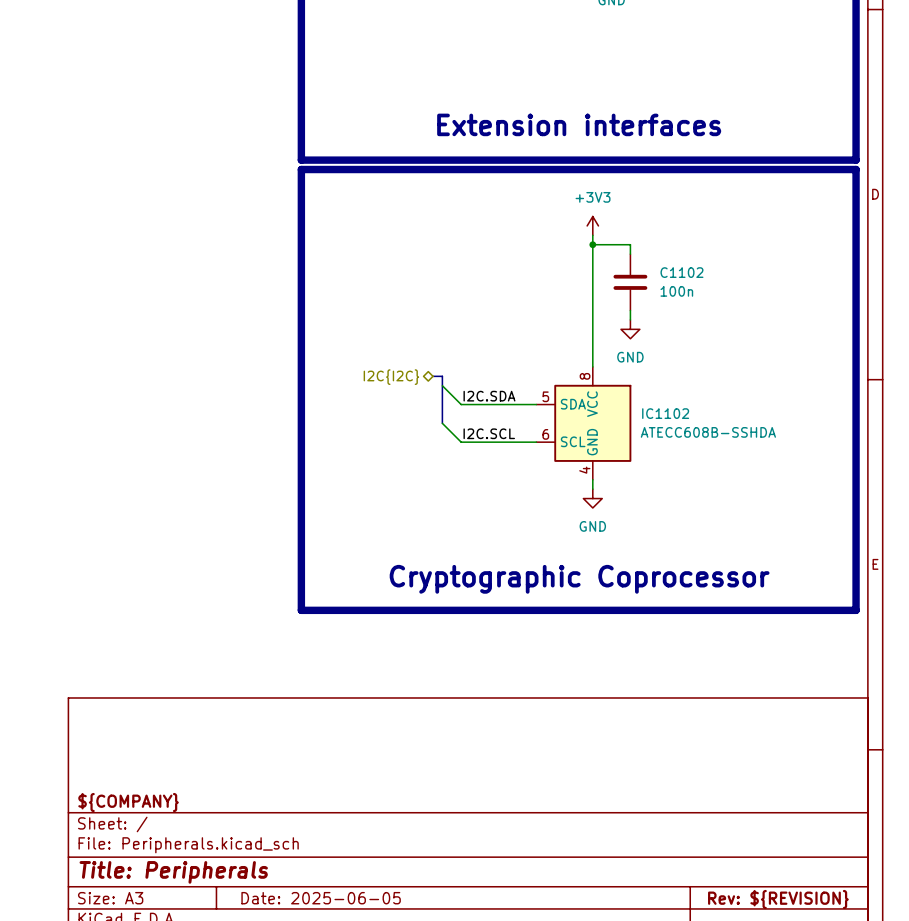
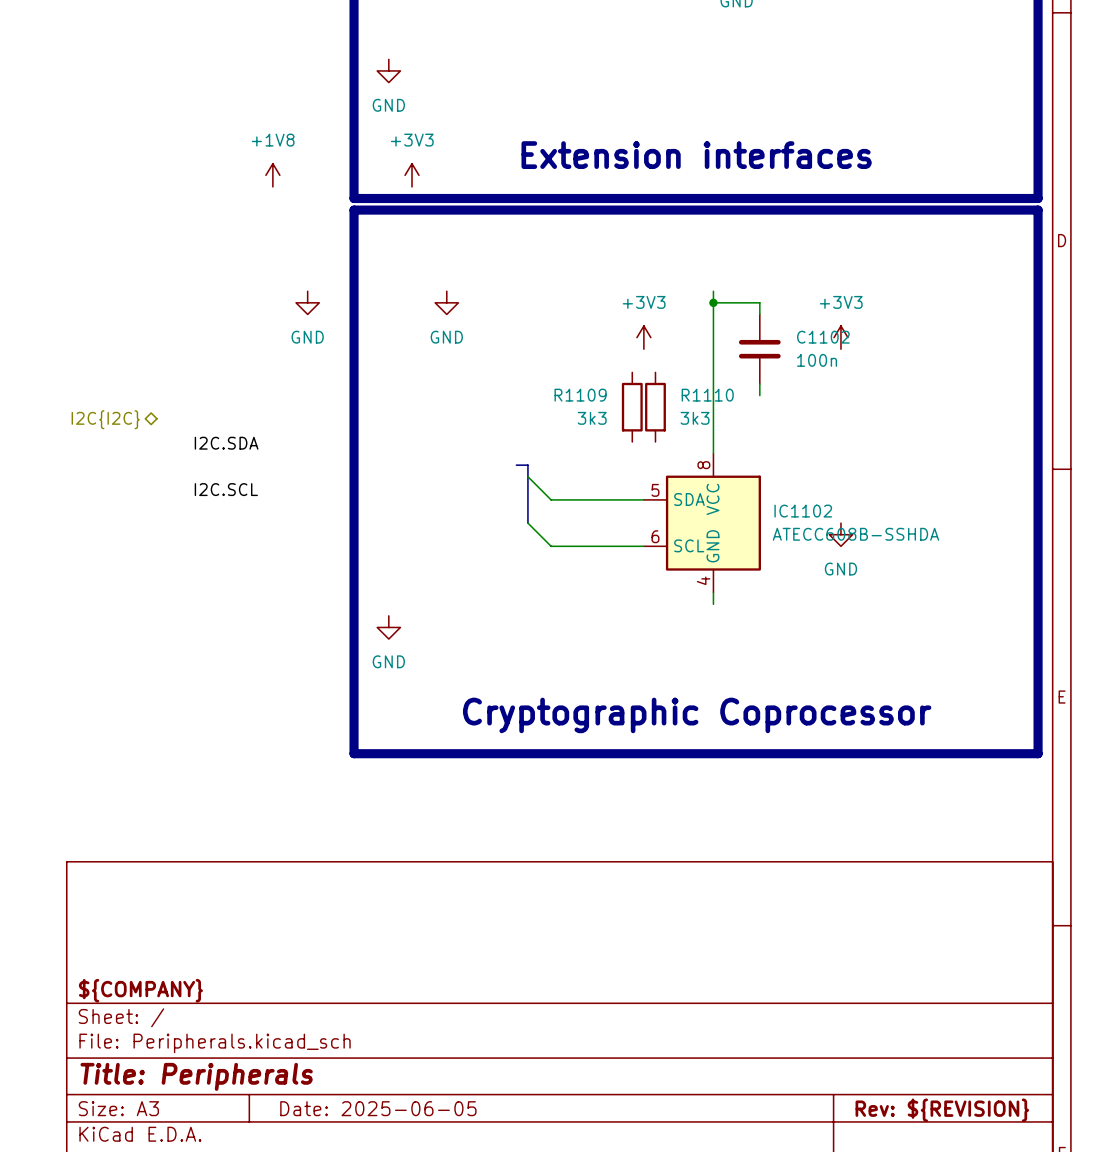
power symbol: none -> GND (388, 70)
power symbol: none -> +1V8 (272, 175)
power symbol: none -> +3V3 (412, 175)
power symbol: +3V3 (592, 225) -> none
power symbol: none -> GND (307, 302)
power symbol: none -> GND (446, 302)
power symbol: none -> +3V3 (643, 337)
power symbol: none -> +3V3 (840, 337)
R1109: none -> 3k3 (632, 407)
R1110: none -> 3k3 (655, 407)
power symbol: GND (630, 329) -> none
hierarchical label: none -> I2C{I2C} (105, 419)
label: none -> I2C.SDA (226, 443)
hierarchical label: I2C{I2C} (391, 377) -> none
label: none -> I2C.SCL (226, 489)
label: I2C.SDA (489, 396) -> none
power symbol: none -> GND (840, 534)
label: I2C.SCL (489, 433) -> none
power symbol: GND (592, 498) -> none
power symbol: none -> GND (388, 627)

